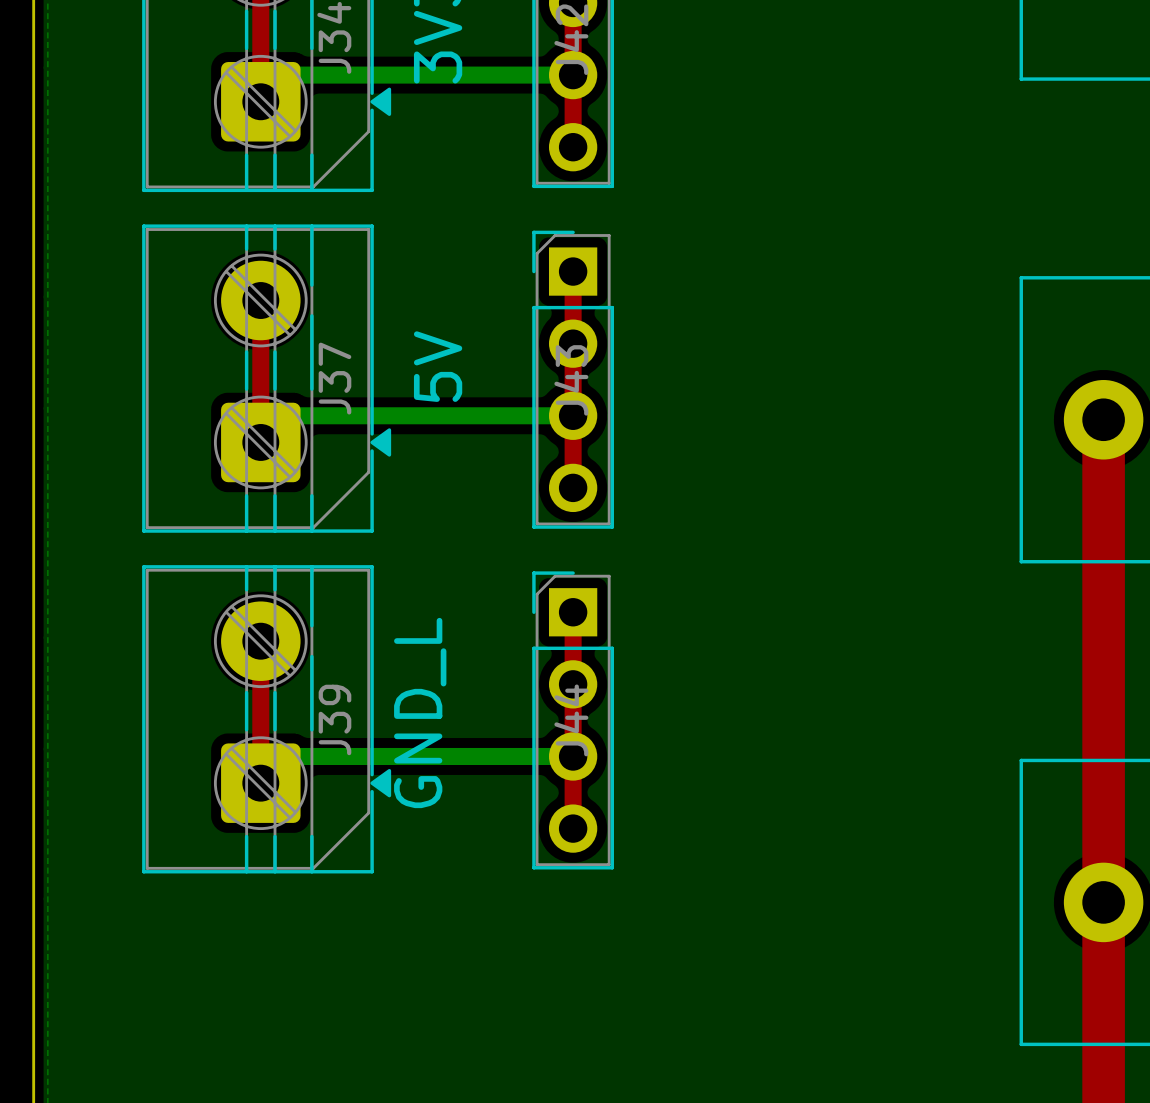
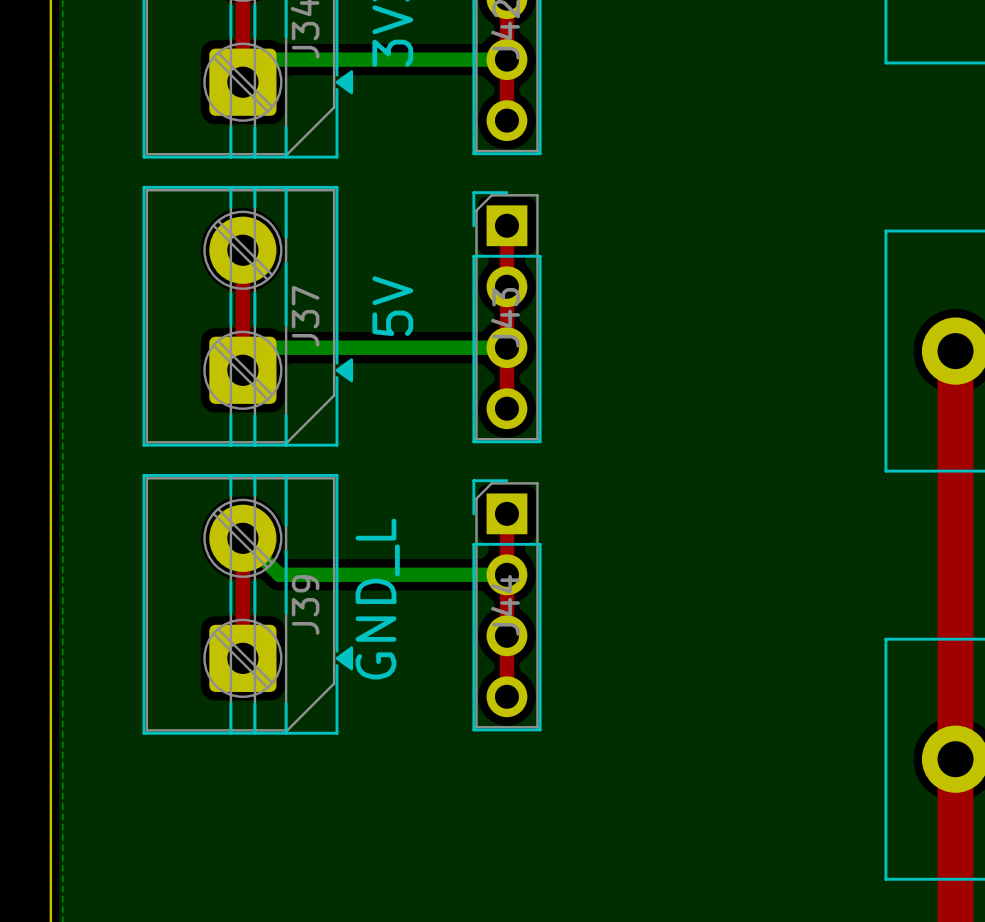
bottom track: none -> (242, 538) (279, 574) (506, 574)
bottom track: (573, 756) (287, 756) (260, 783) -> none

